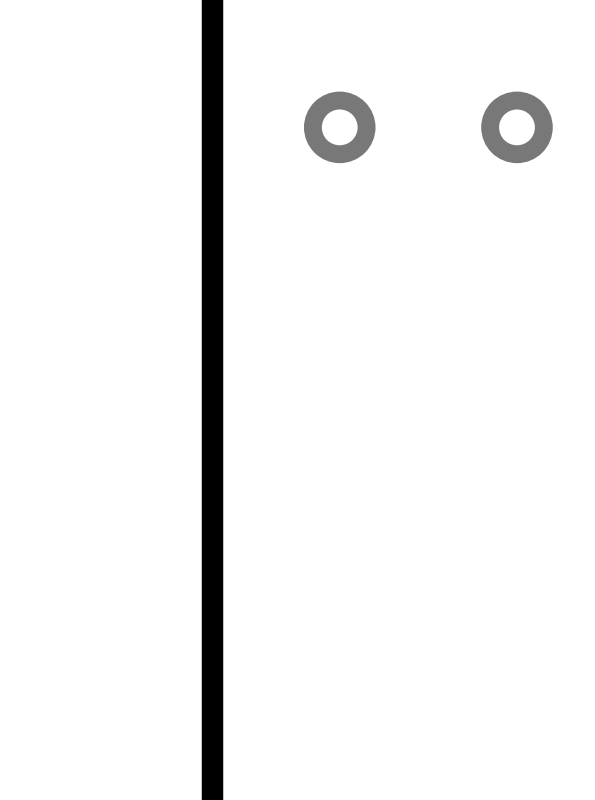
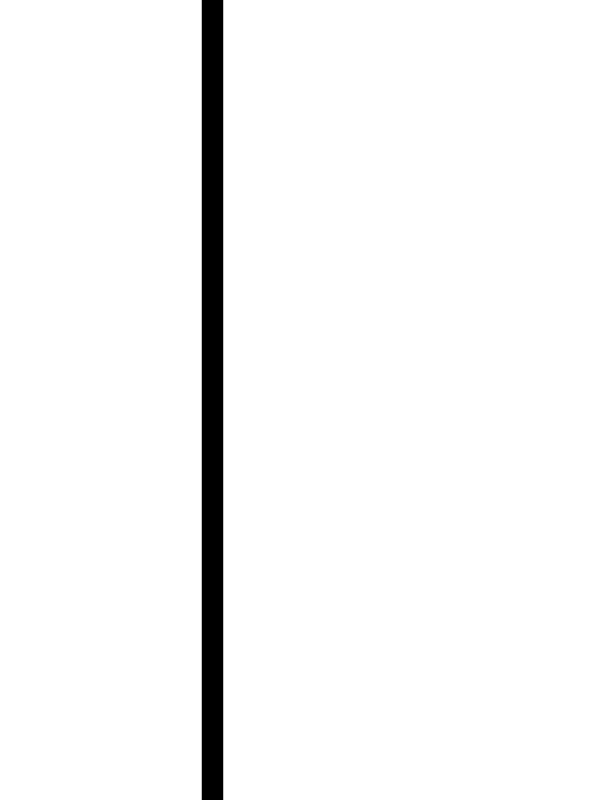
via: (339, 127) -> none
via: (516, 127) -> none

